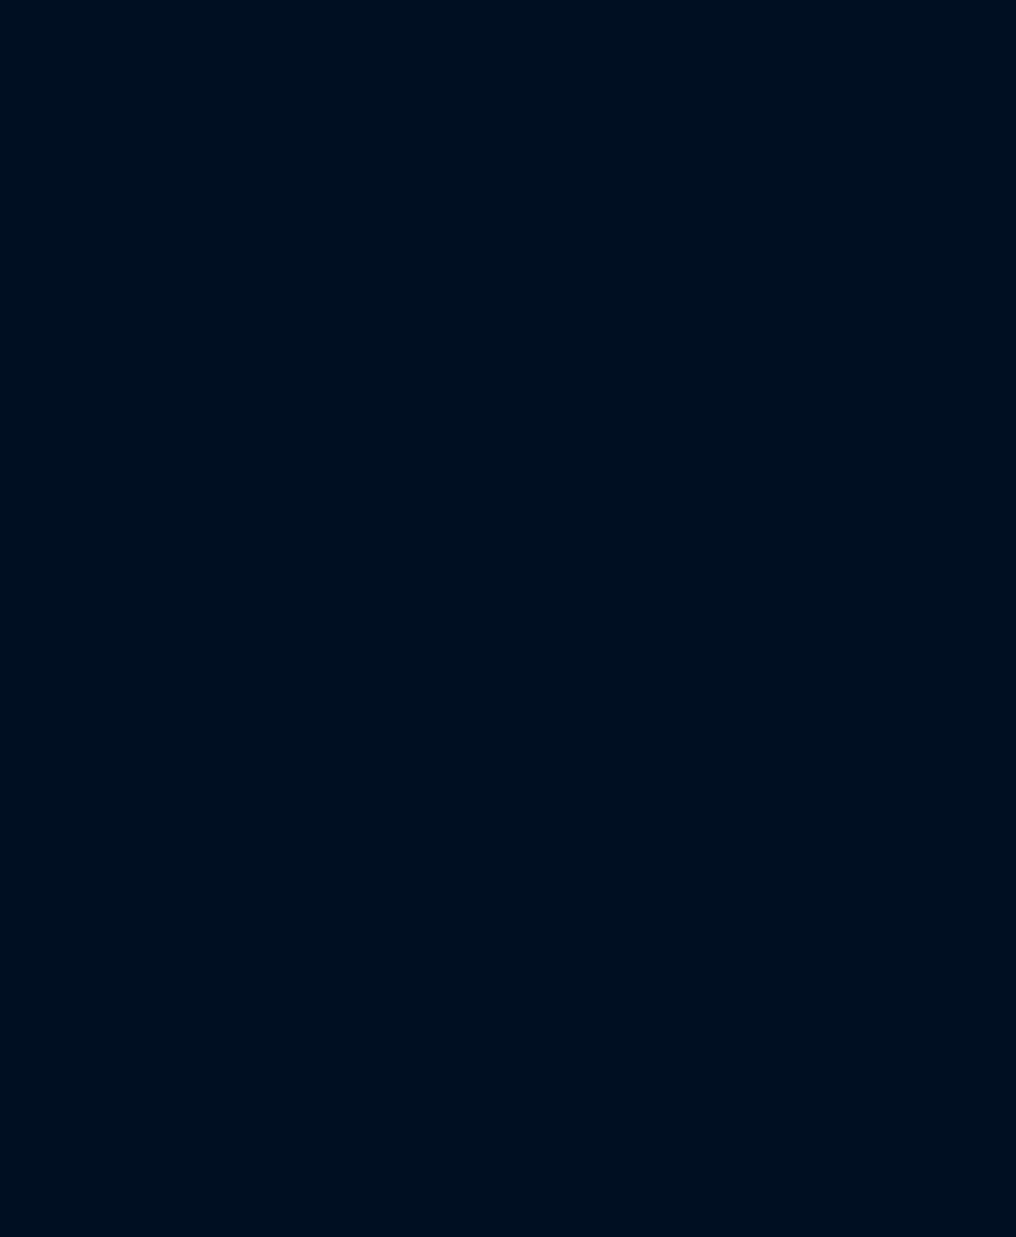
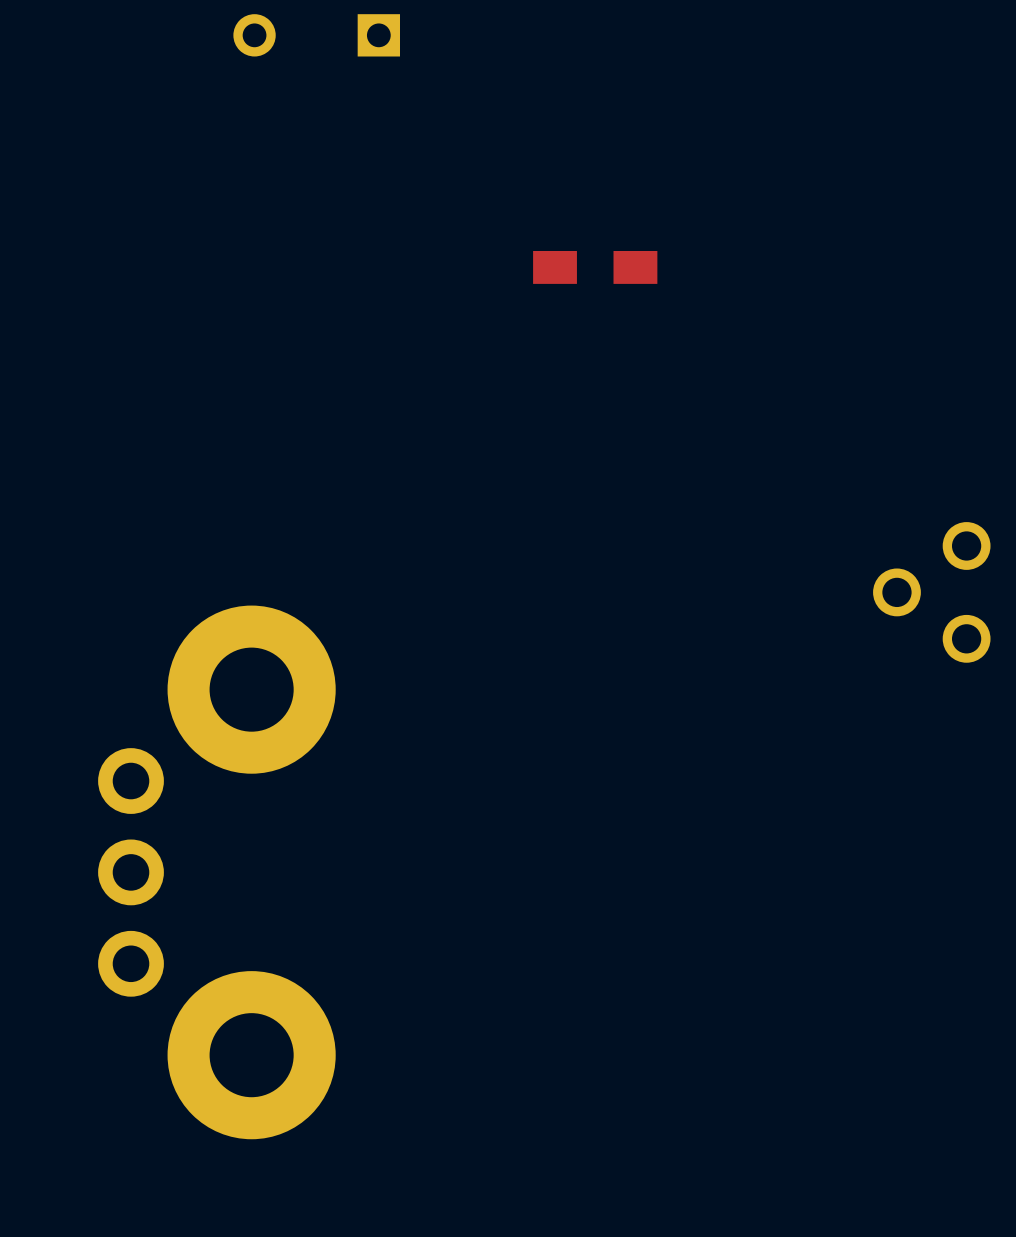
part: none -> (316, 35)
part: none -> (595, 267)
part: none -> (931, 592)
part: none -> (216, 872)

